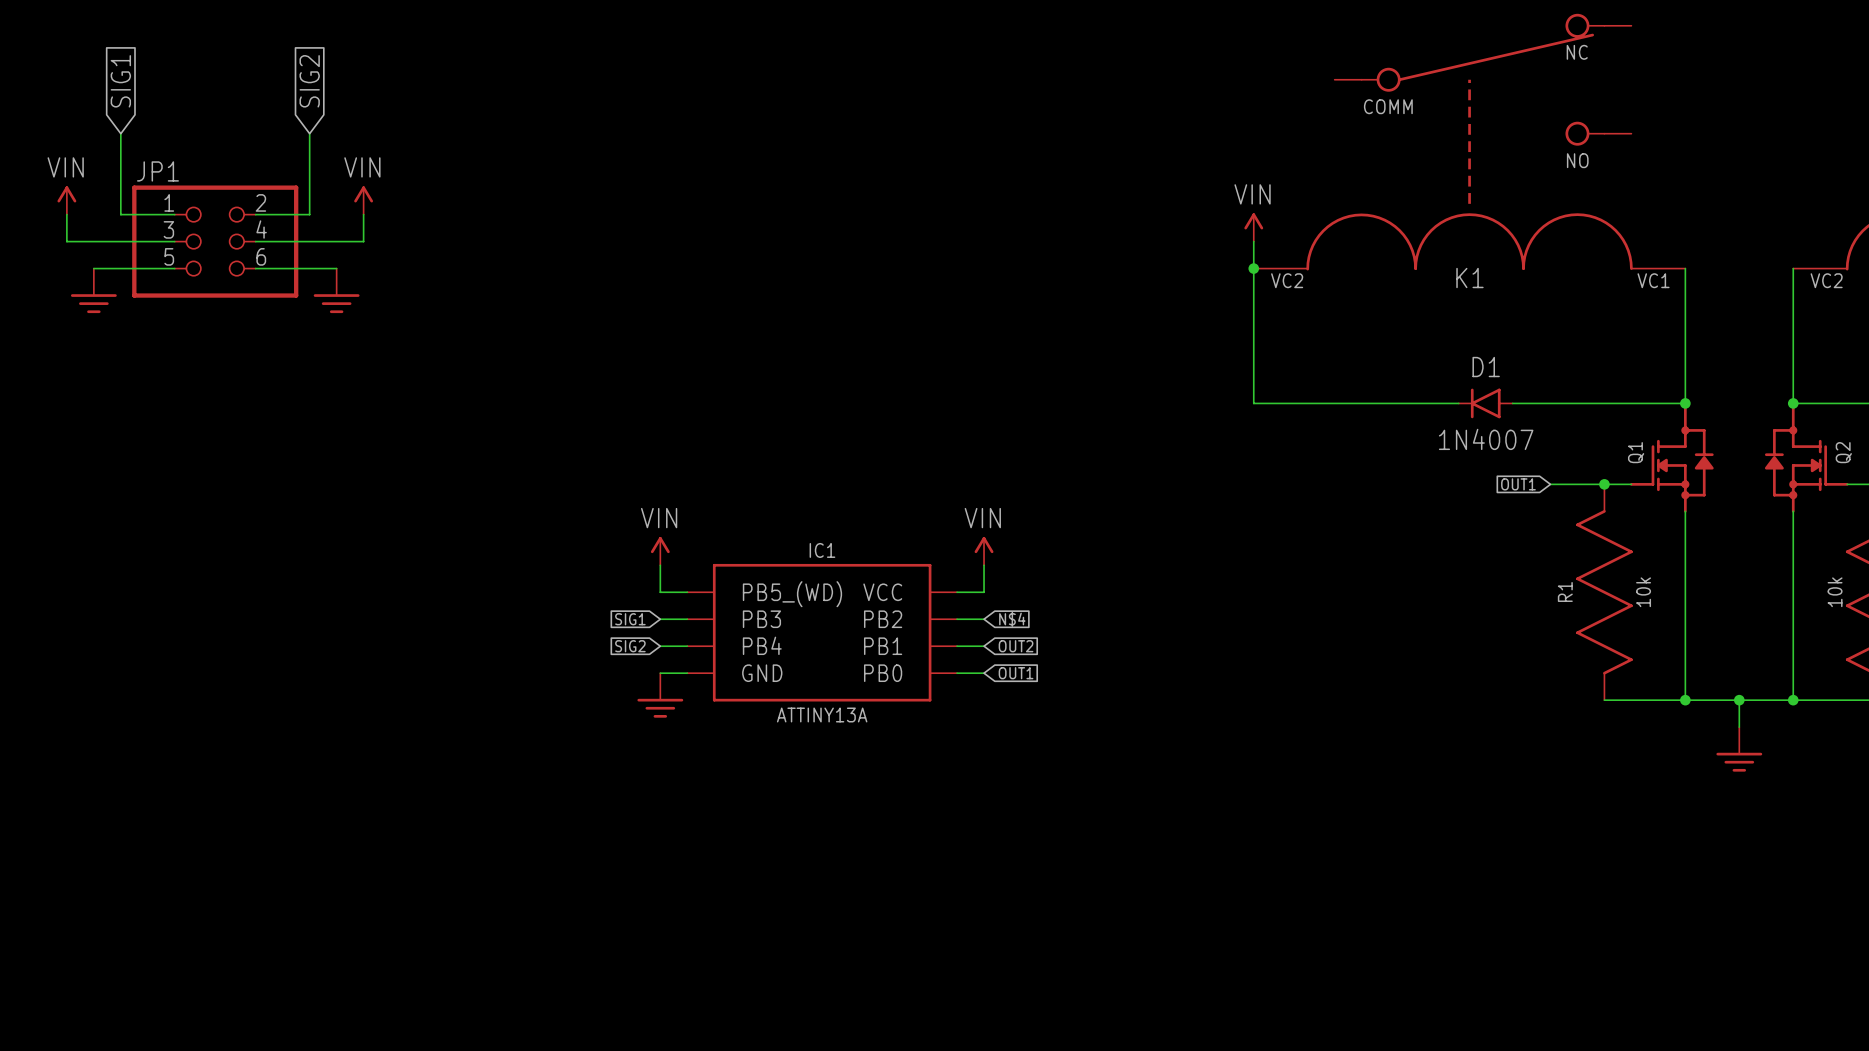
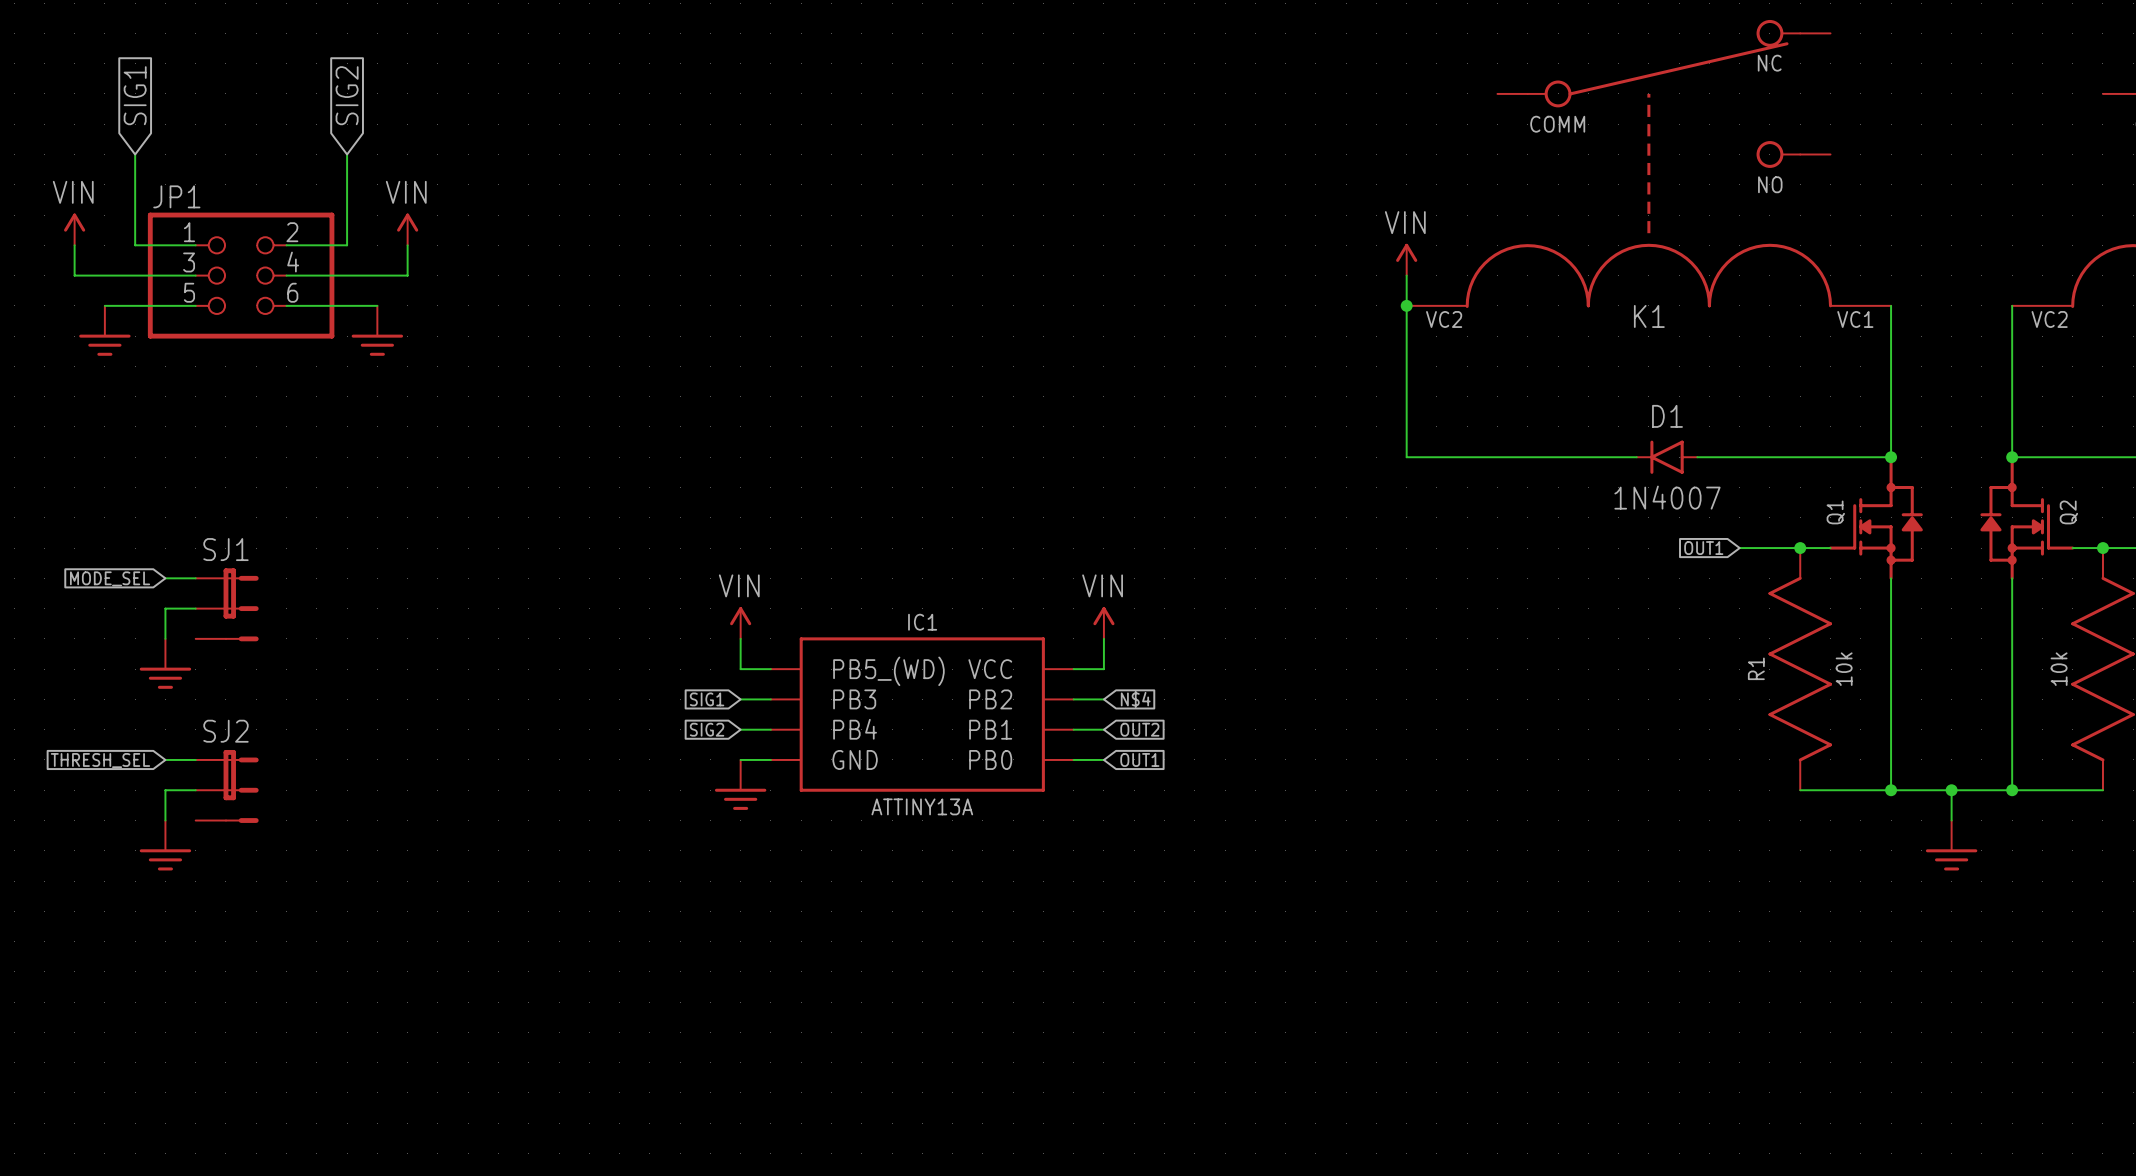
global label: none -> MODE_SEL (110, 578)
wire: none -> (165, 578) (195, 578)
SJ1: none -> (227, 604)
wire: none -> (195, 608) (165, 608) (165, 638)
power symbol: none -> (165, 663)
global label: none -> THRESH_SEL (100, 760)
wire: none -> (165, 759) (195, 759)
SJ2: none -> (227, 786)
wire: none -> (195, 790) (165, 790) (165, 820)
power symbol: none -> (165, 845)

